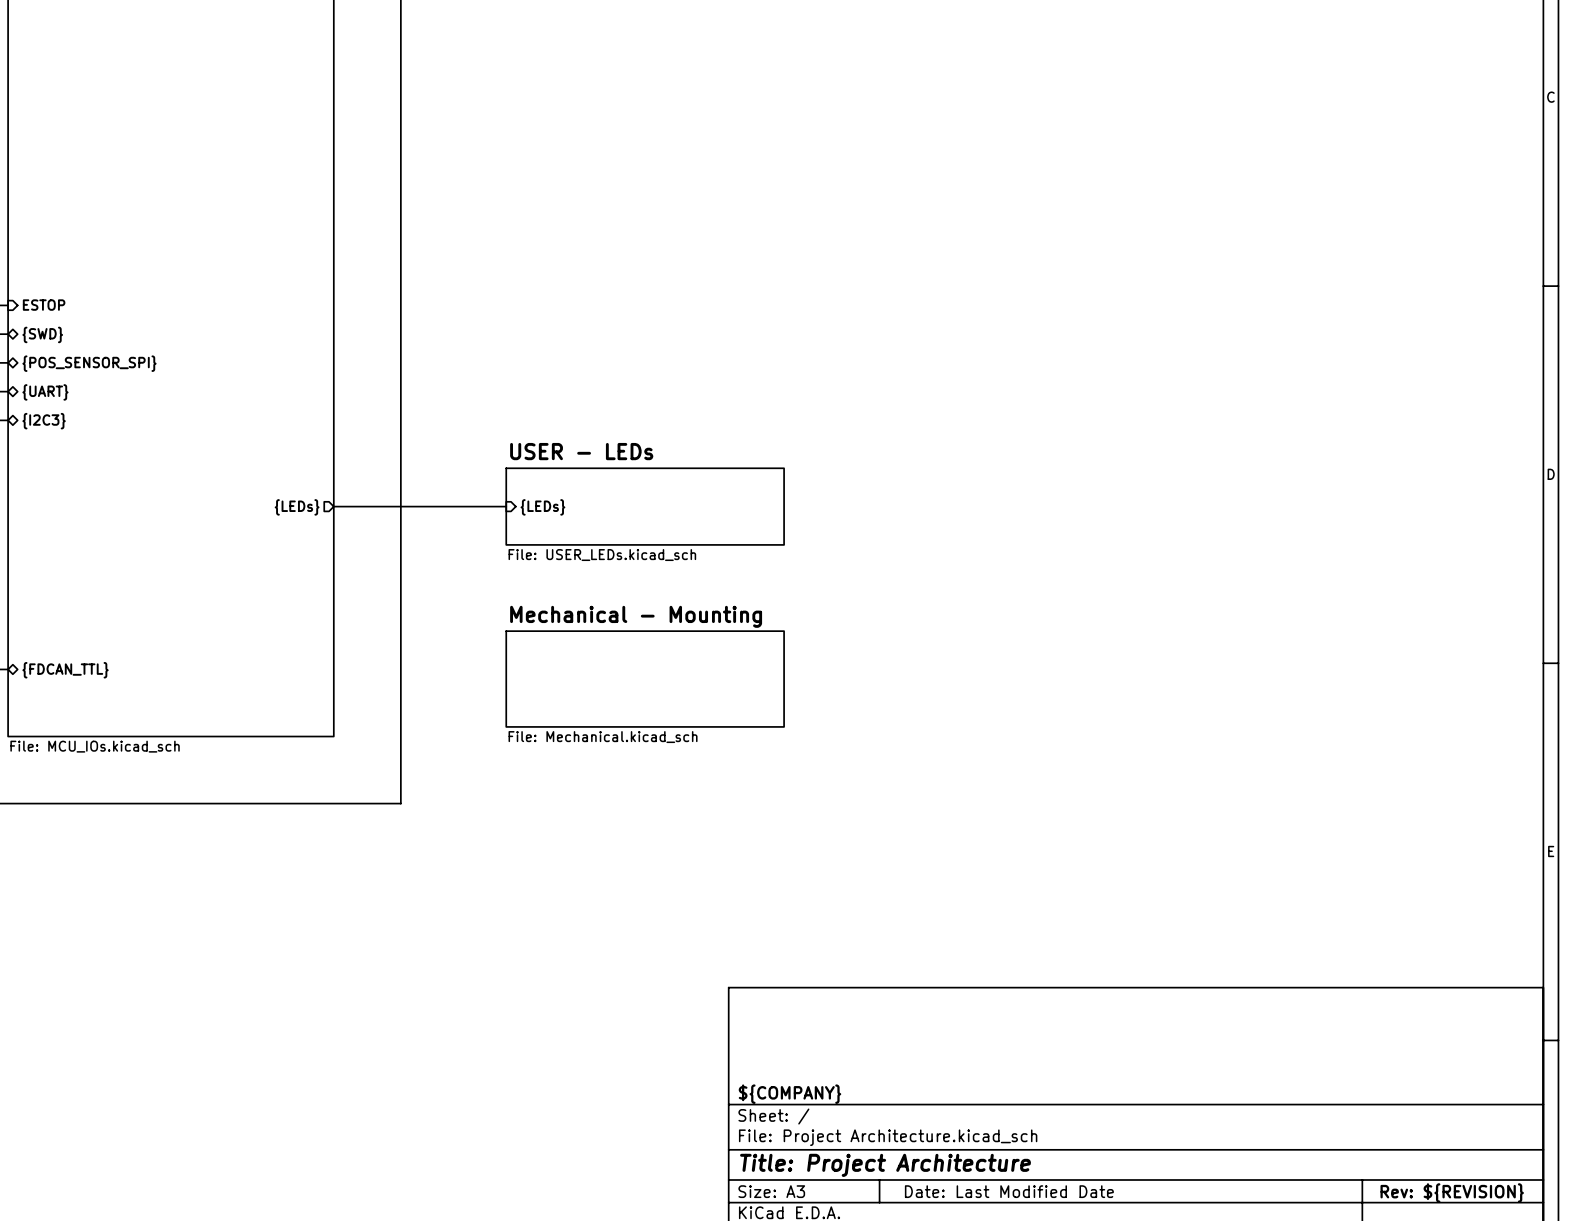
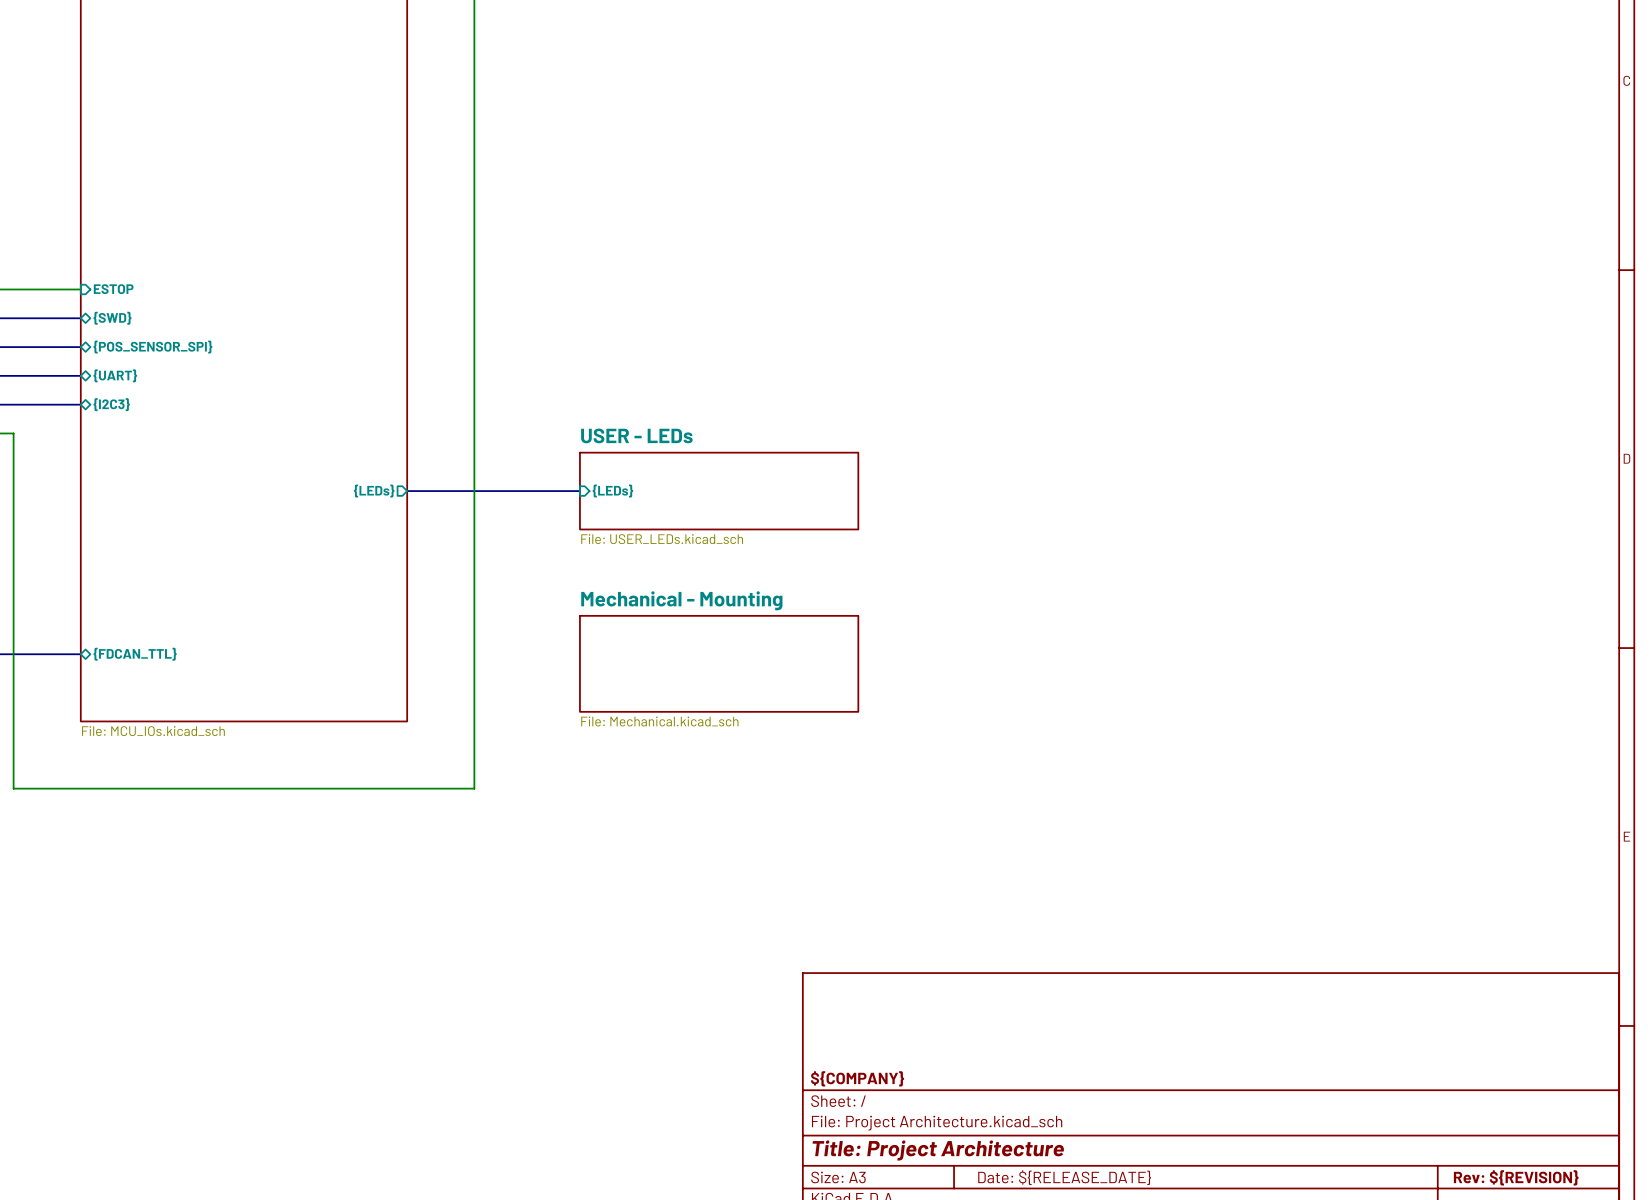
title block: Date: Last Modified Date (1009, 1191) -> Date: ${RELEASE_DATE} (1064, 1177)

